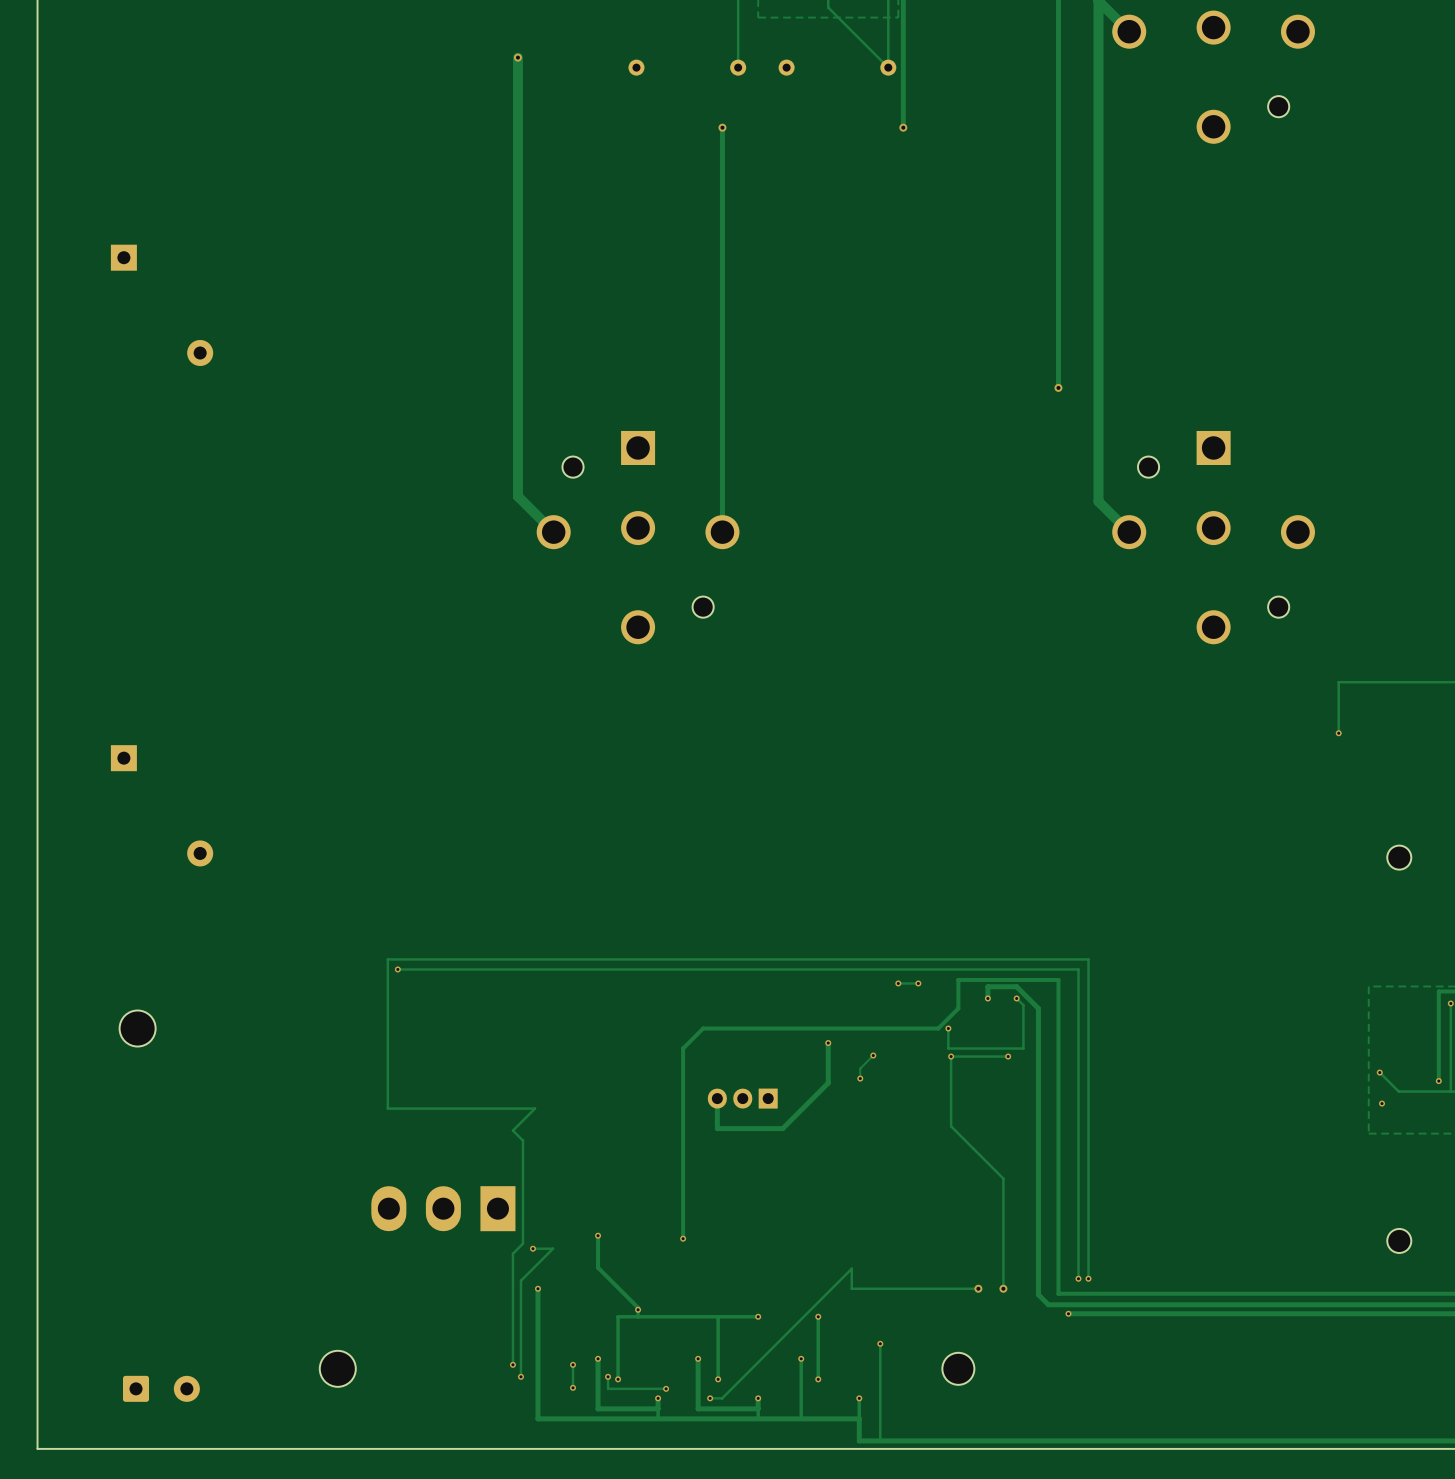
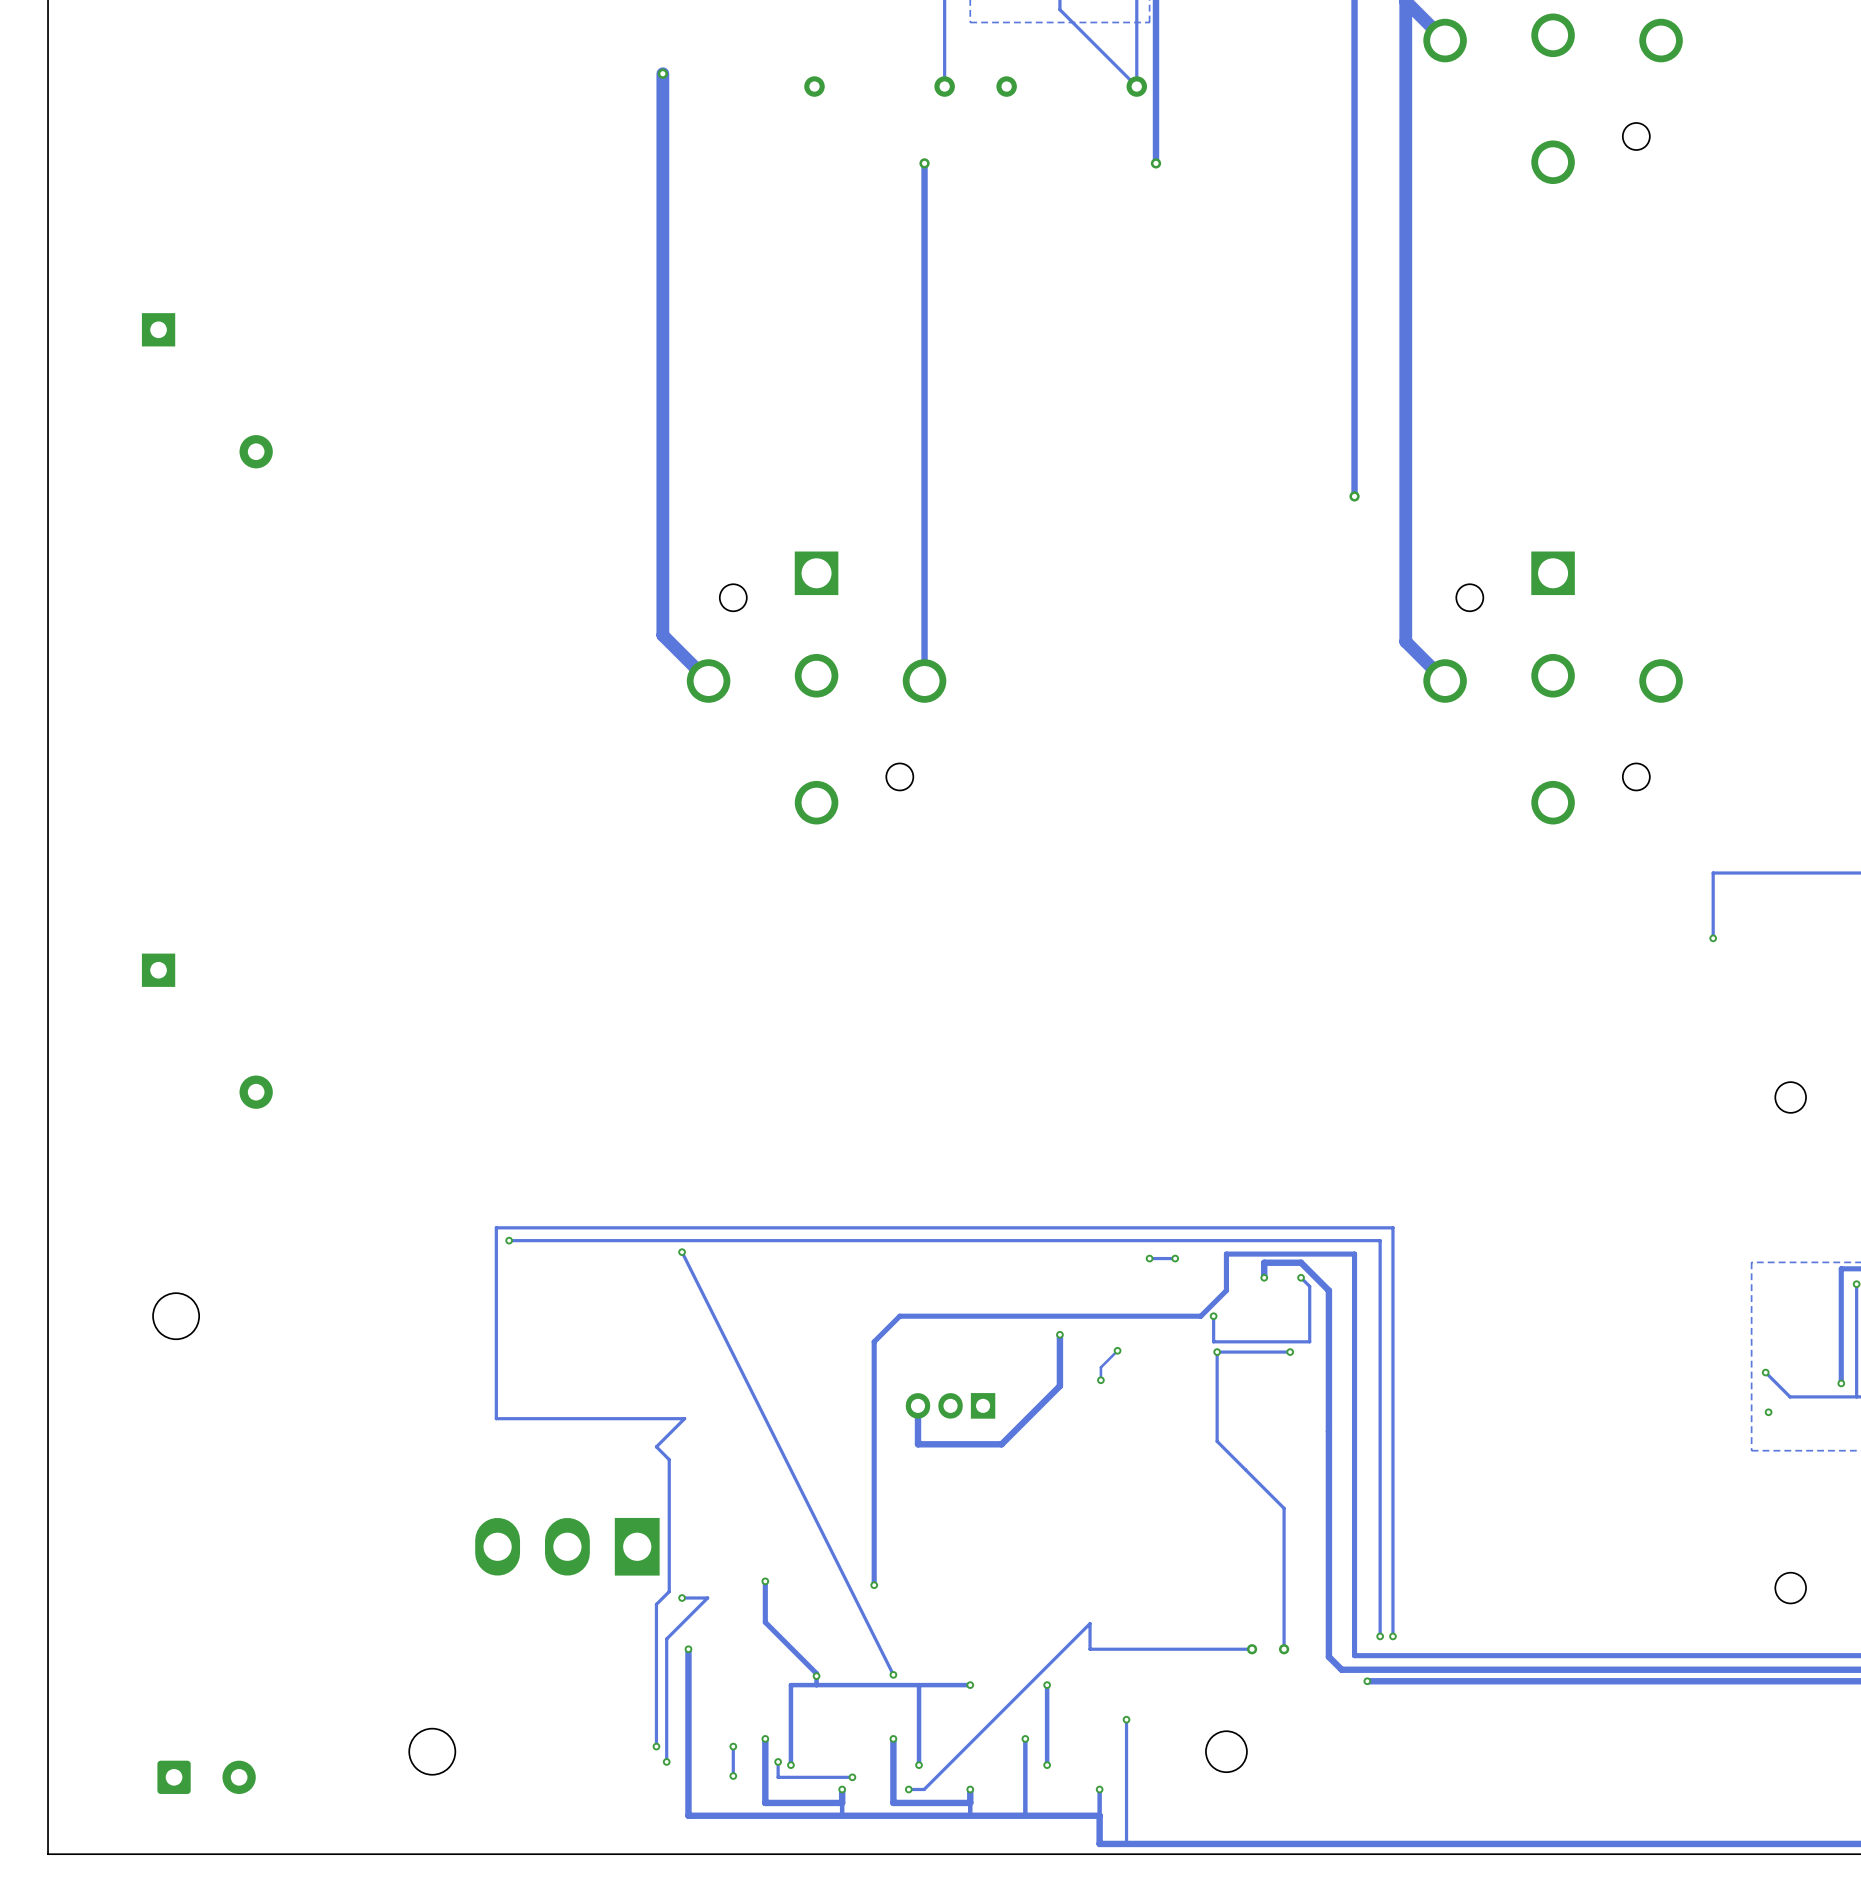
track: none -> (682, 1252) (893, 1674)
via: none -> (682, 1252)
via: none -> (893, 1674)

